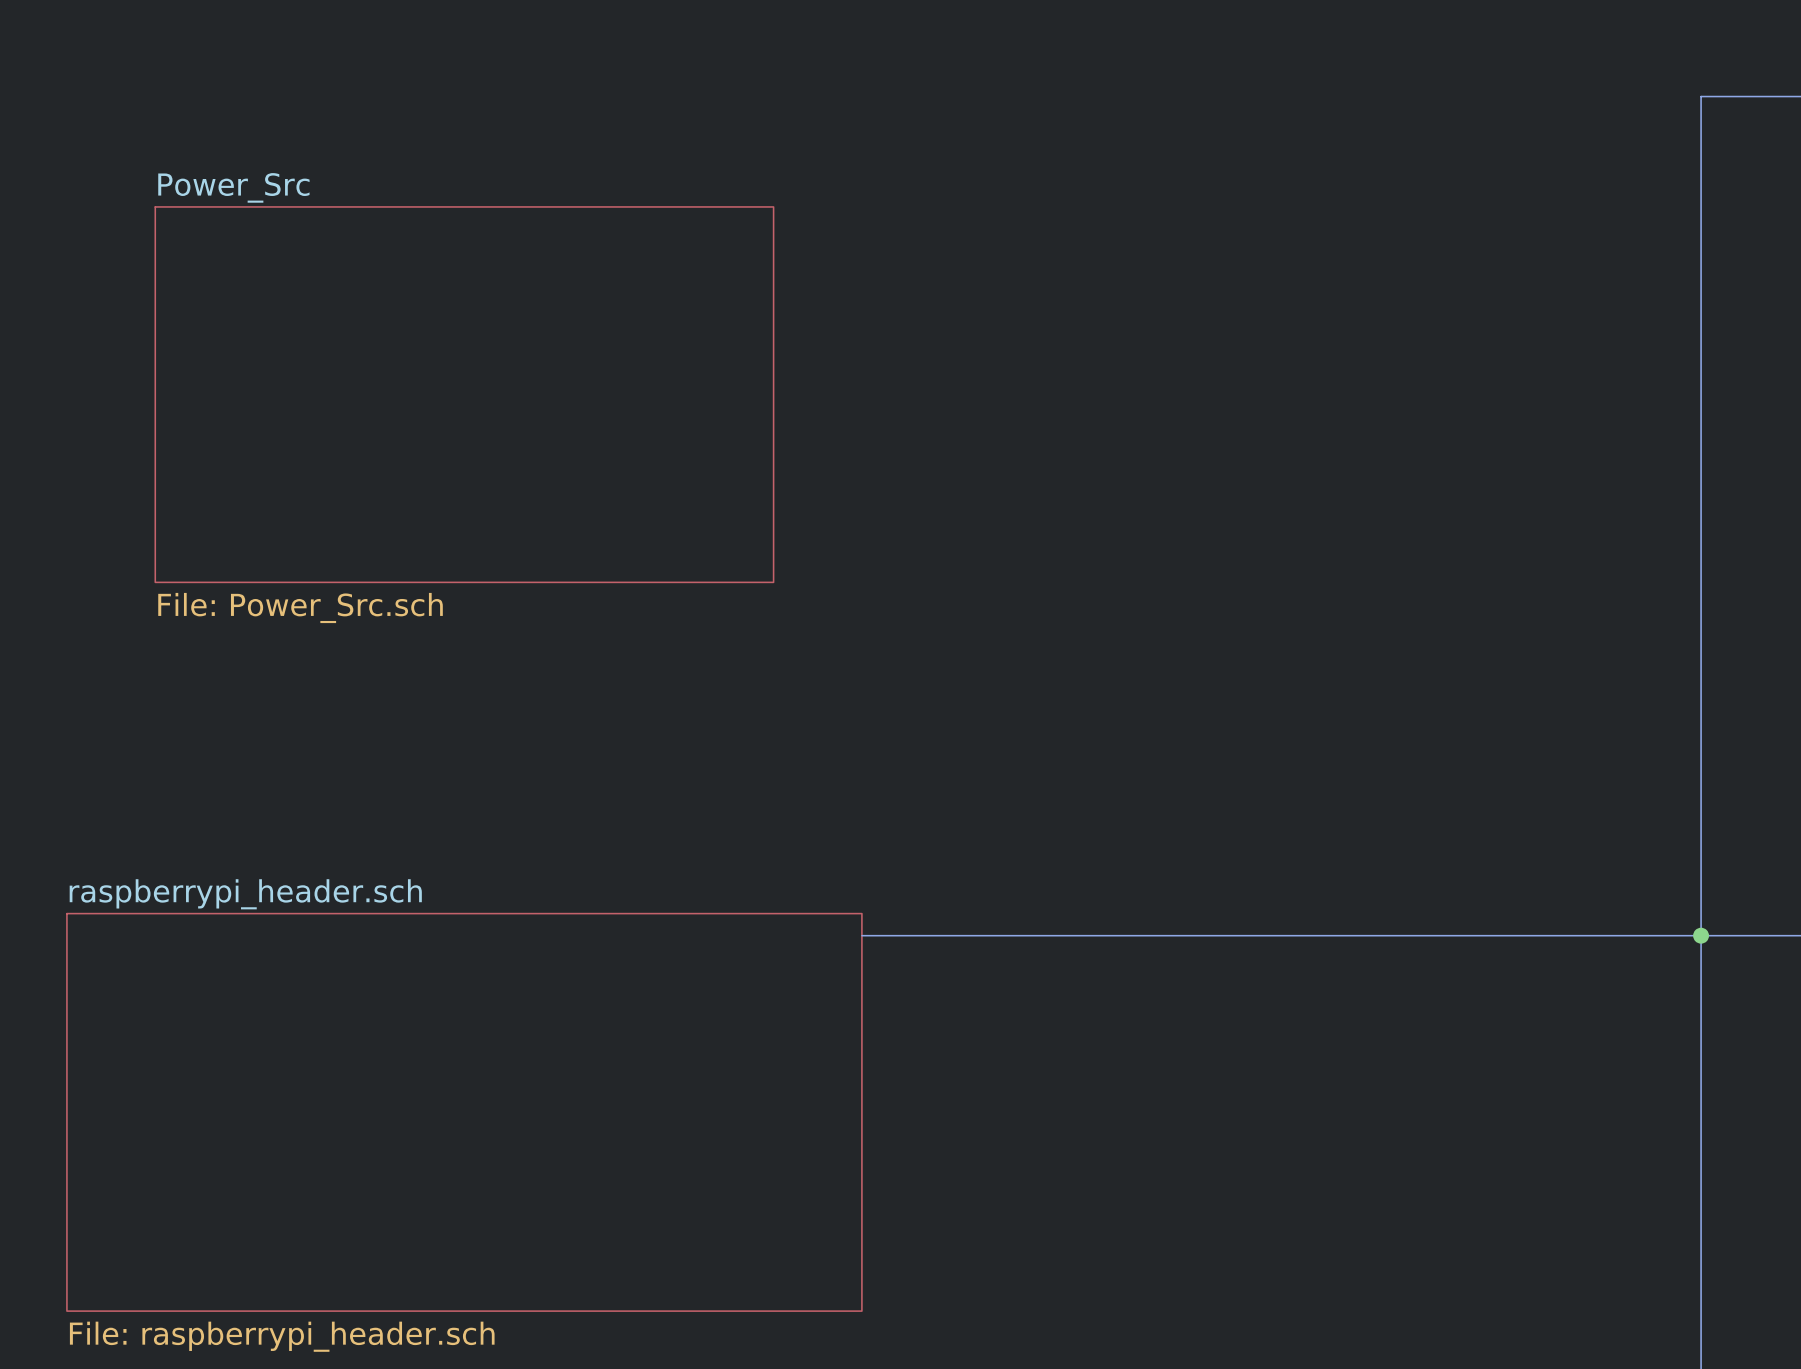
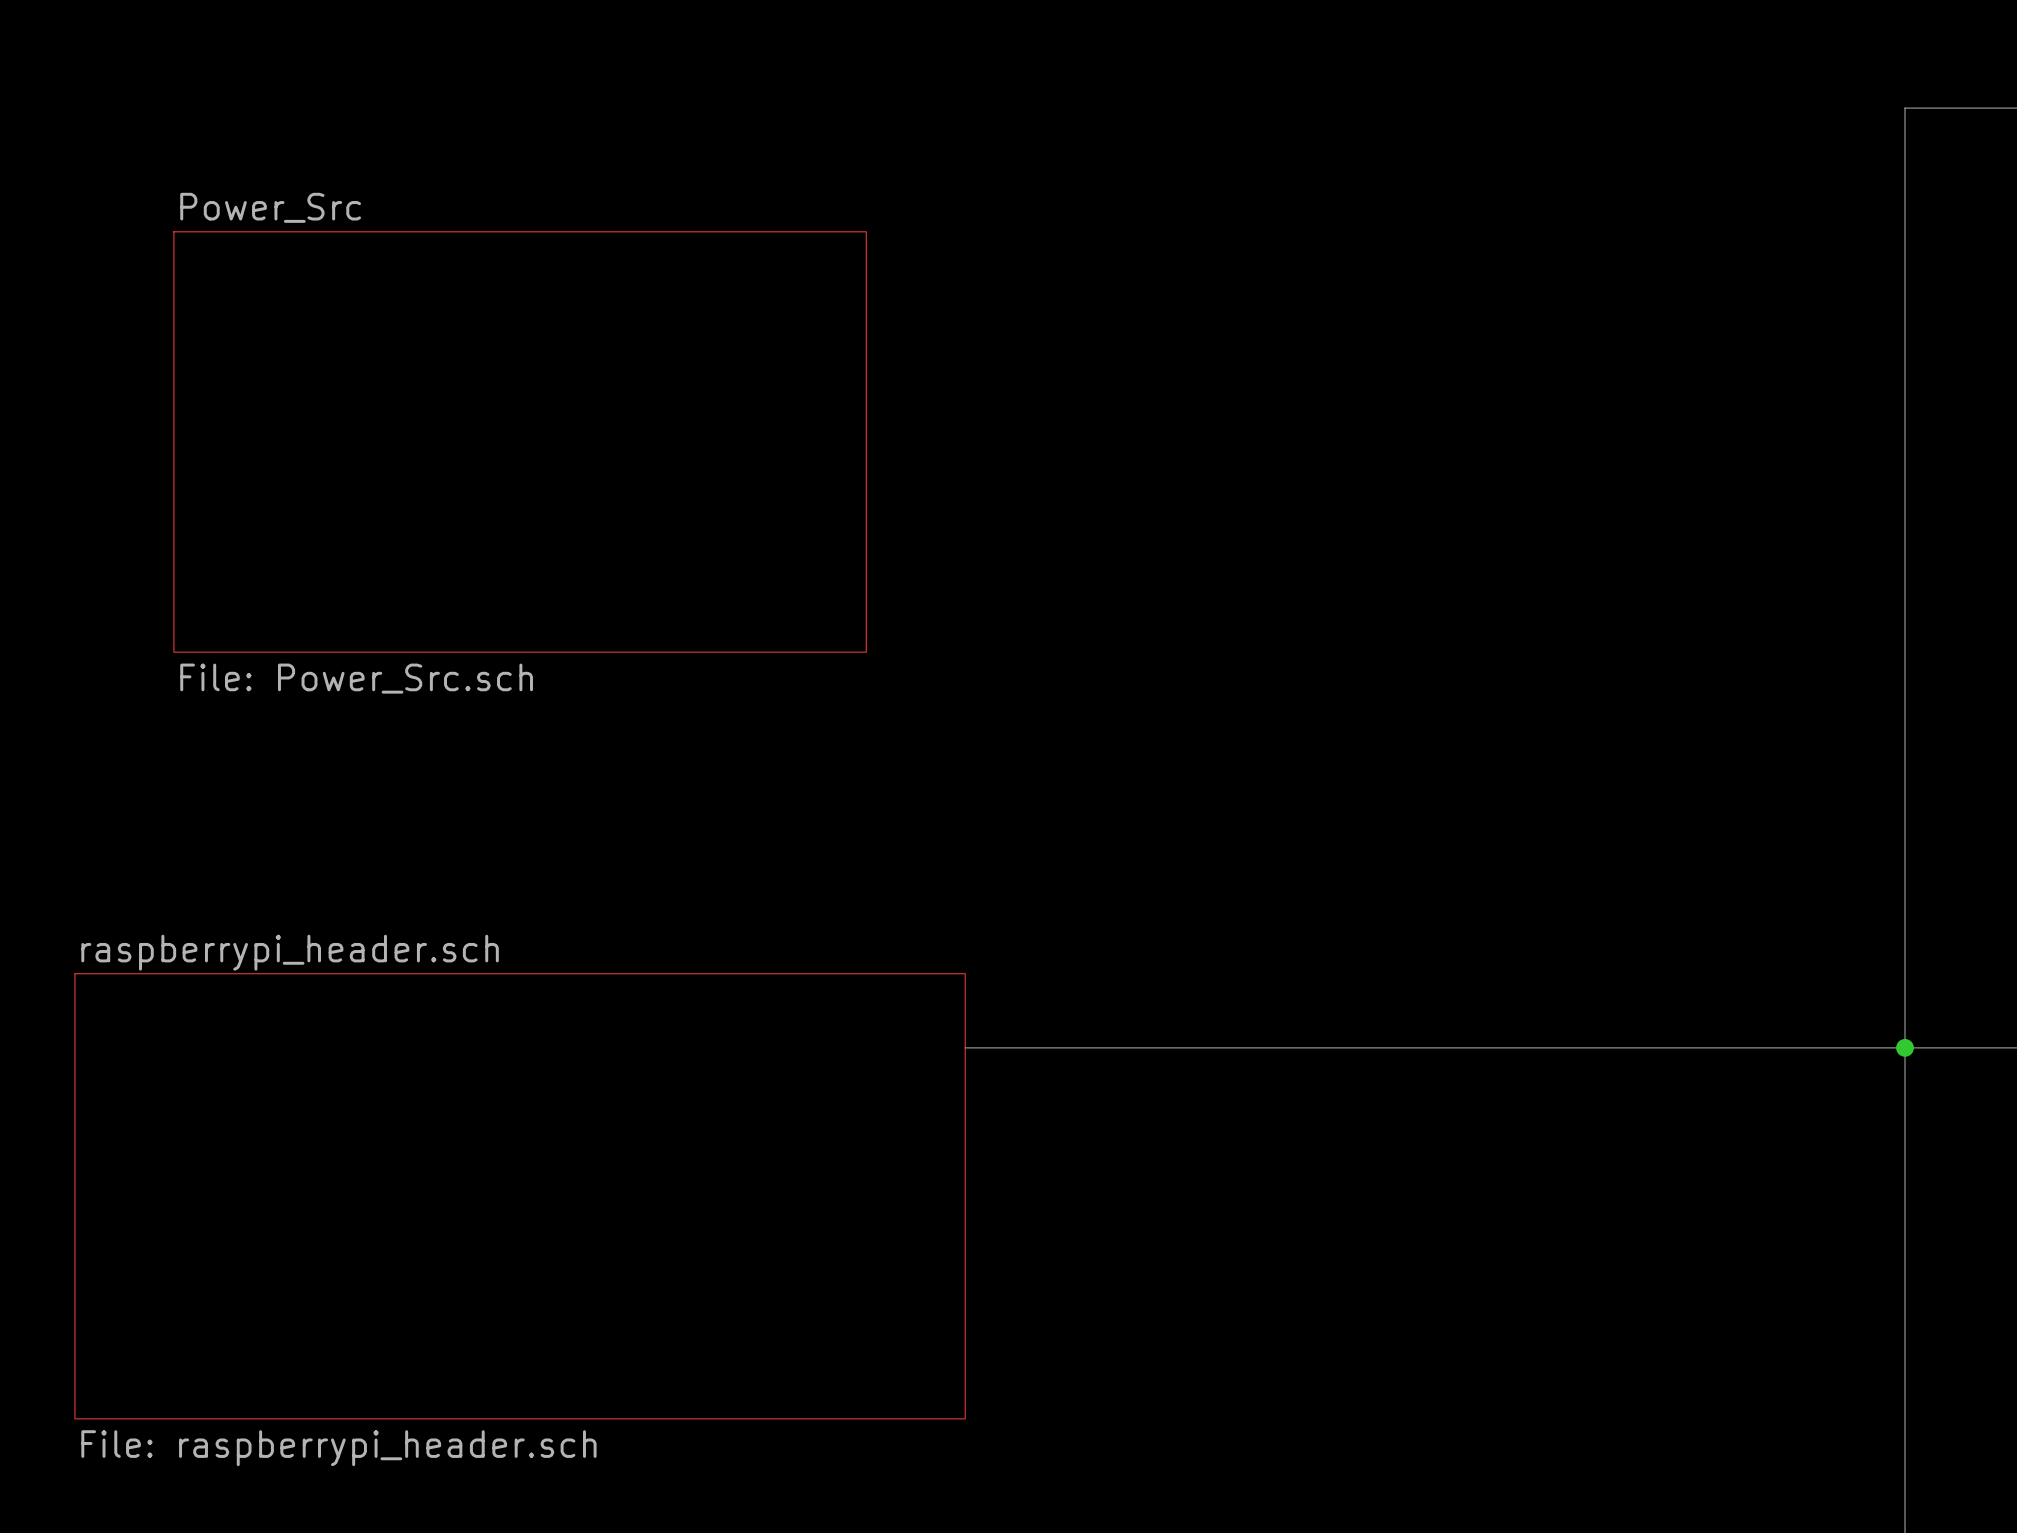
sheet raspberrypi_header.sch position: (464, 1112) -> (520, 1196)

